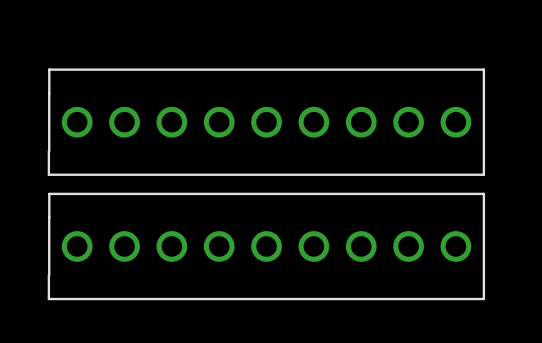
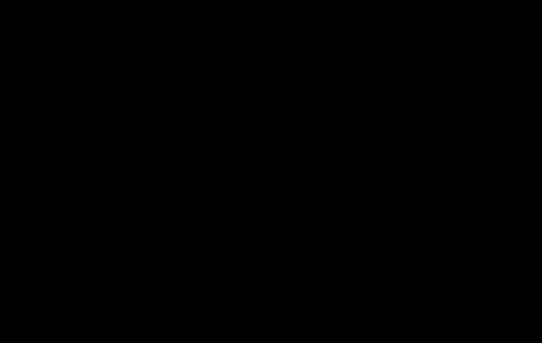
part: (266, 122) -> none
part: (266, 246) -> none

